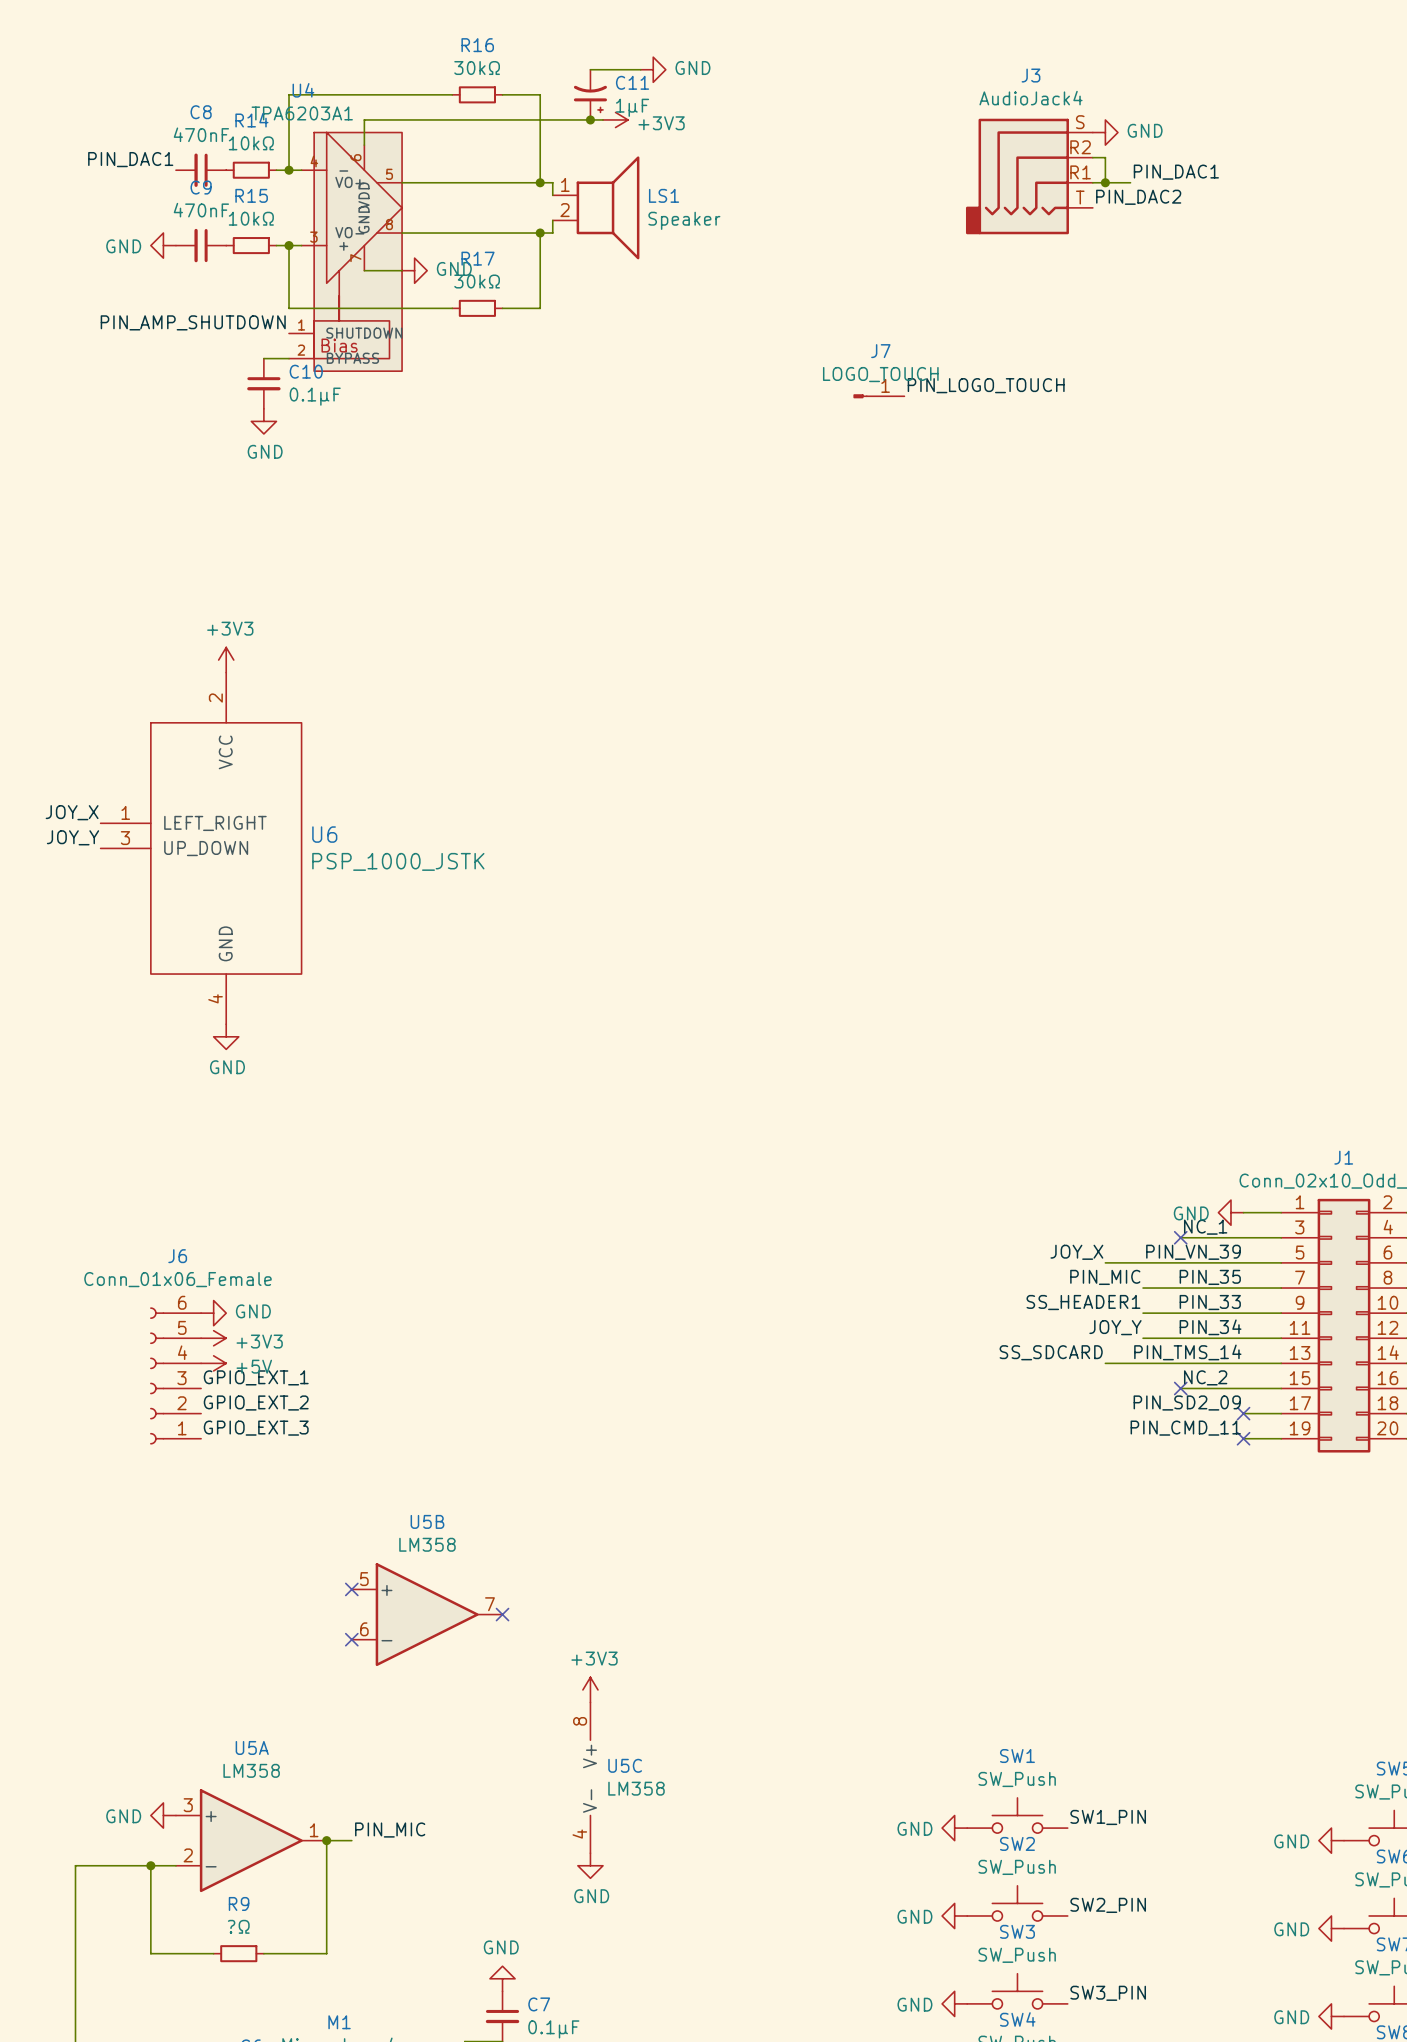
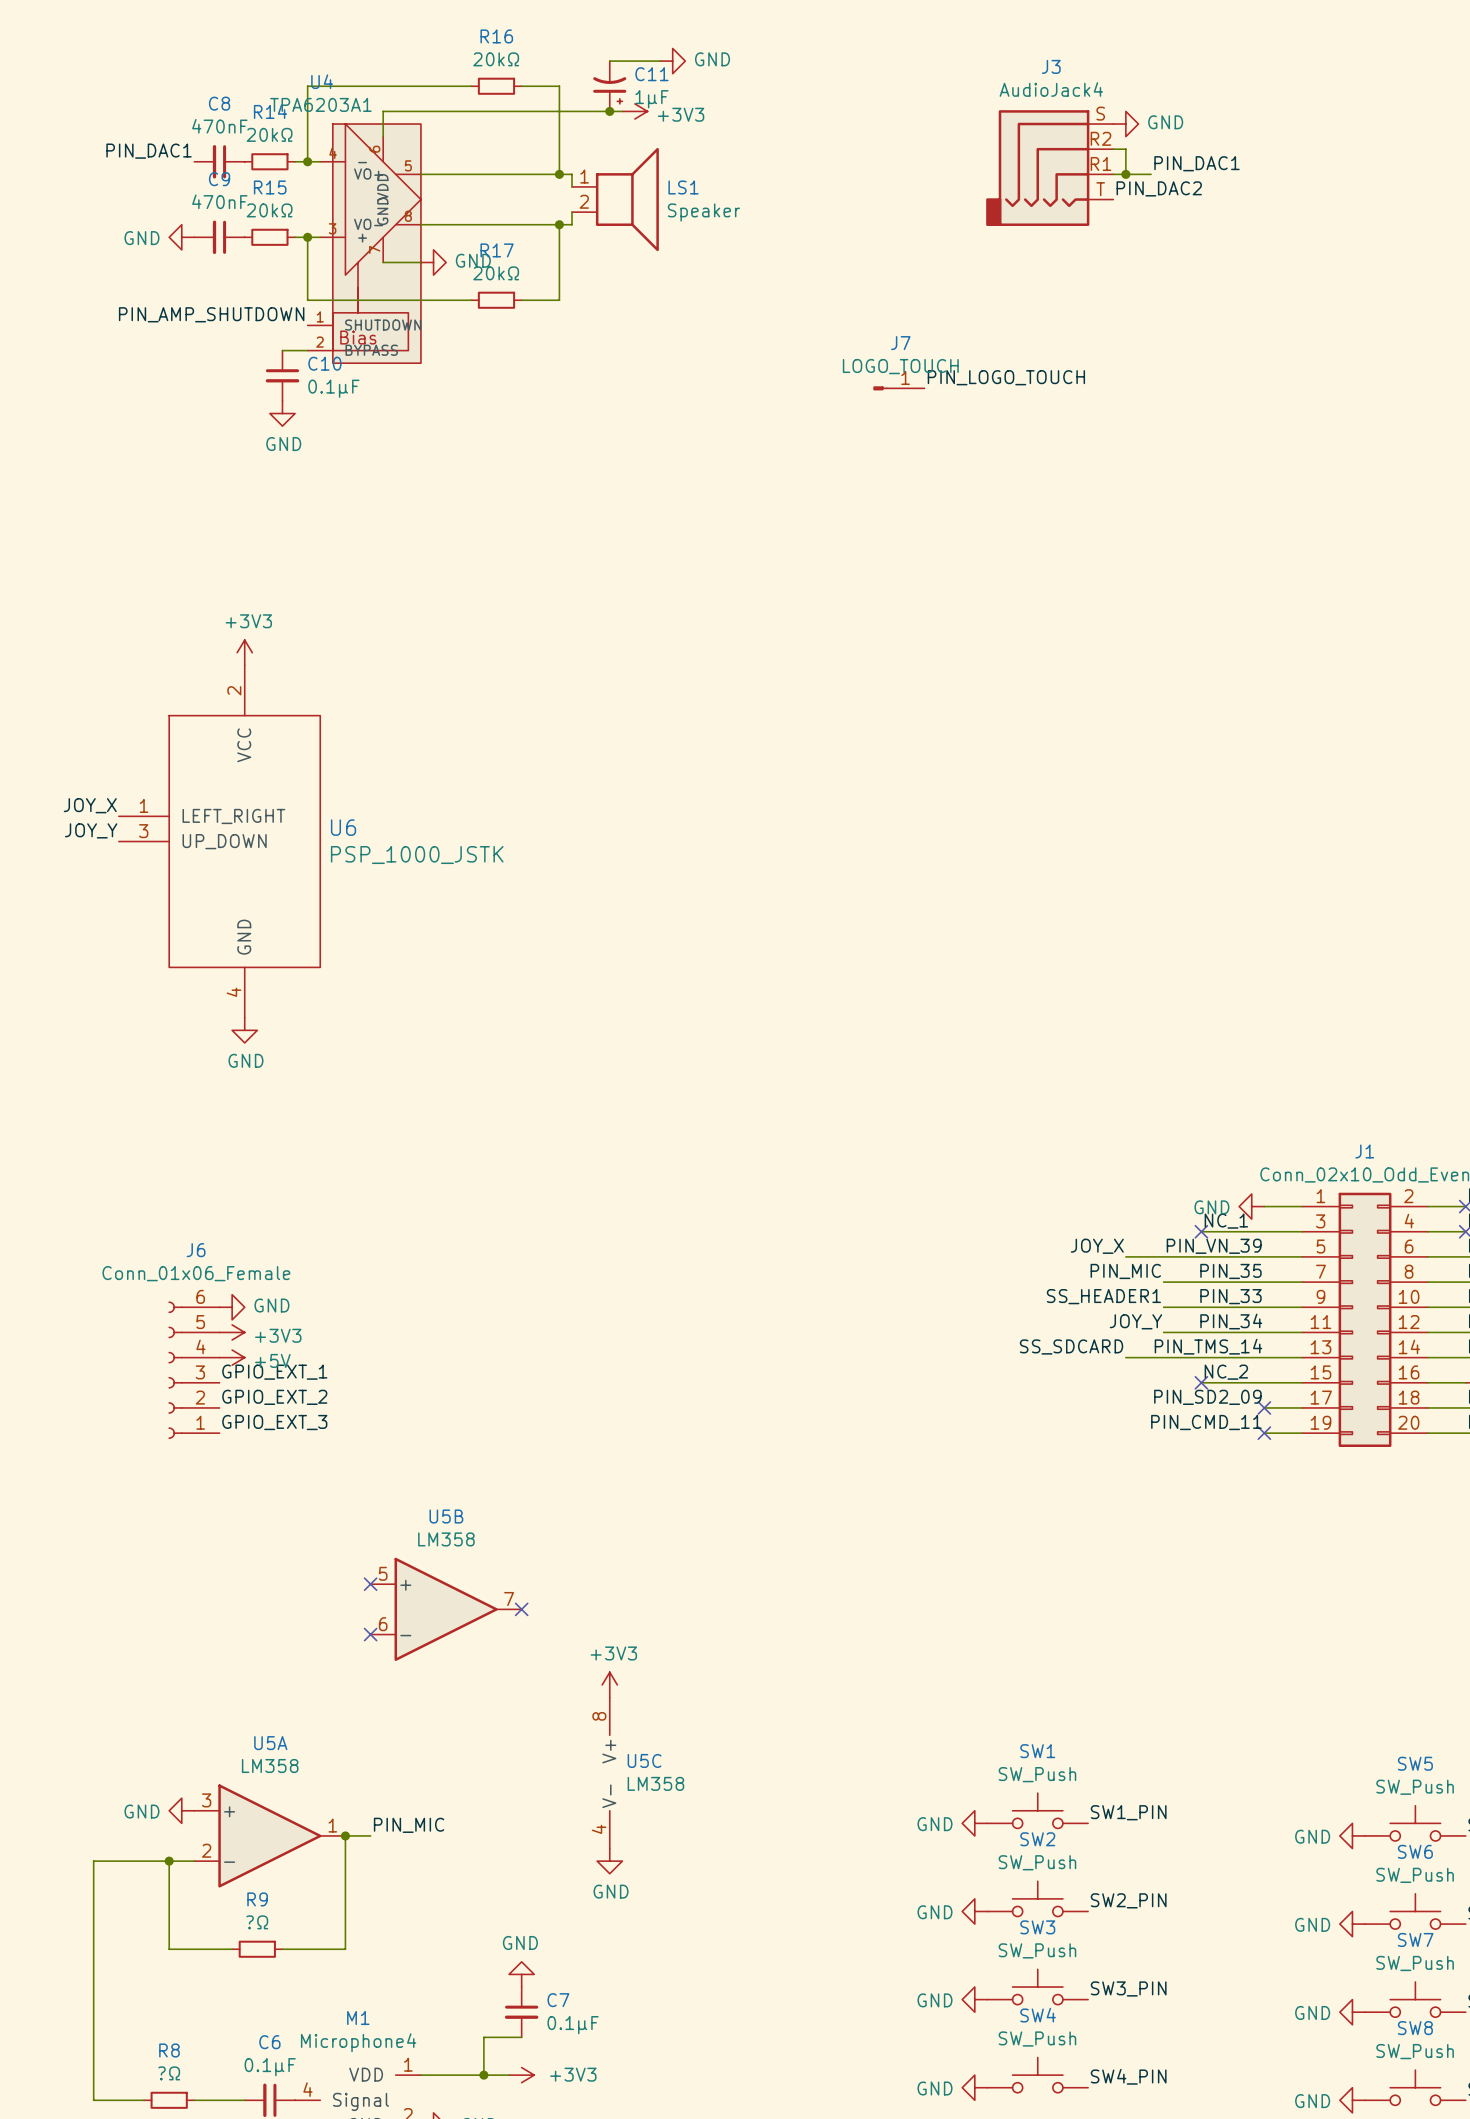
R16 value: 30kΩ (477, 68) -> 20kΩ (496, 59)
R14 value: 10kΩ (251, 143) -> 20kΩ (269, 134)
R15 value: 10kΩ (251, 218) -> 20kΩ (269, 210)
R17 value: 30kΩ (477, 281) -> 20kΩ (496, 273)

